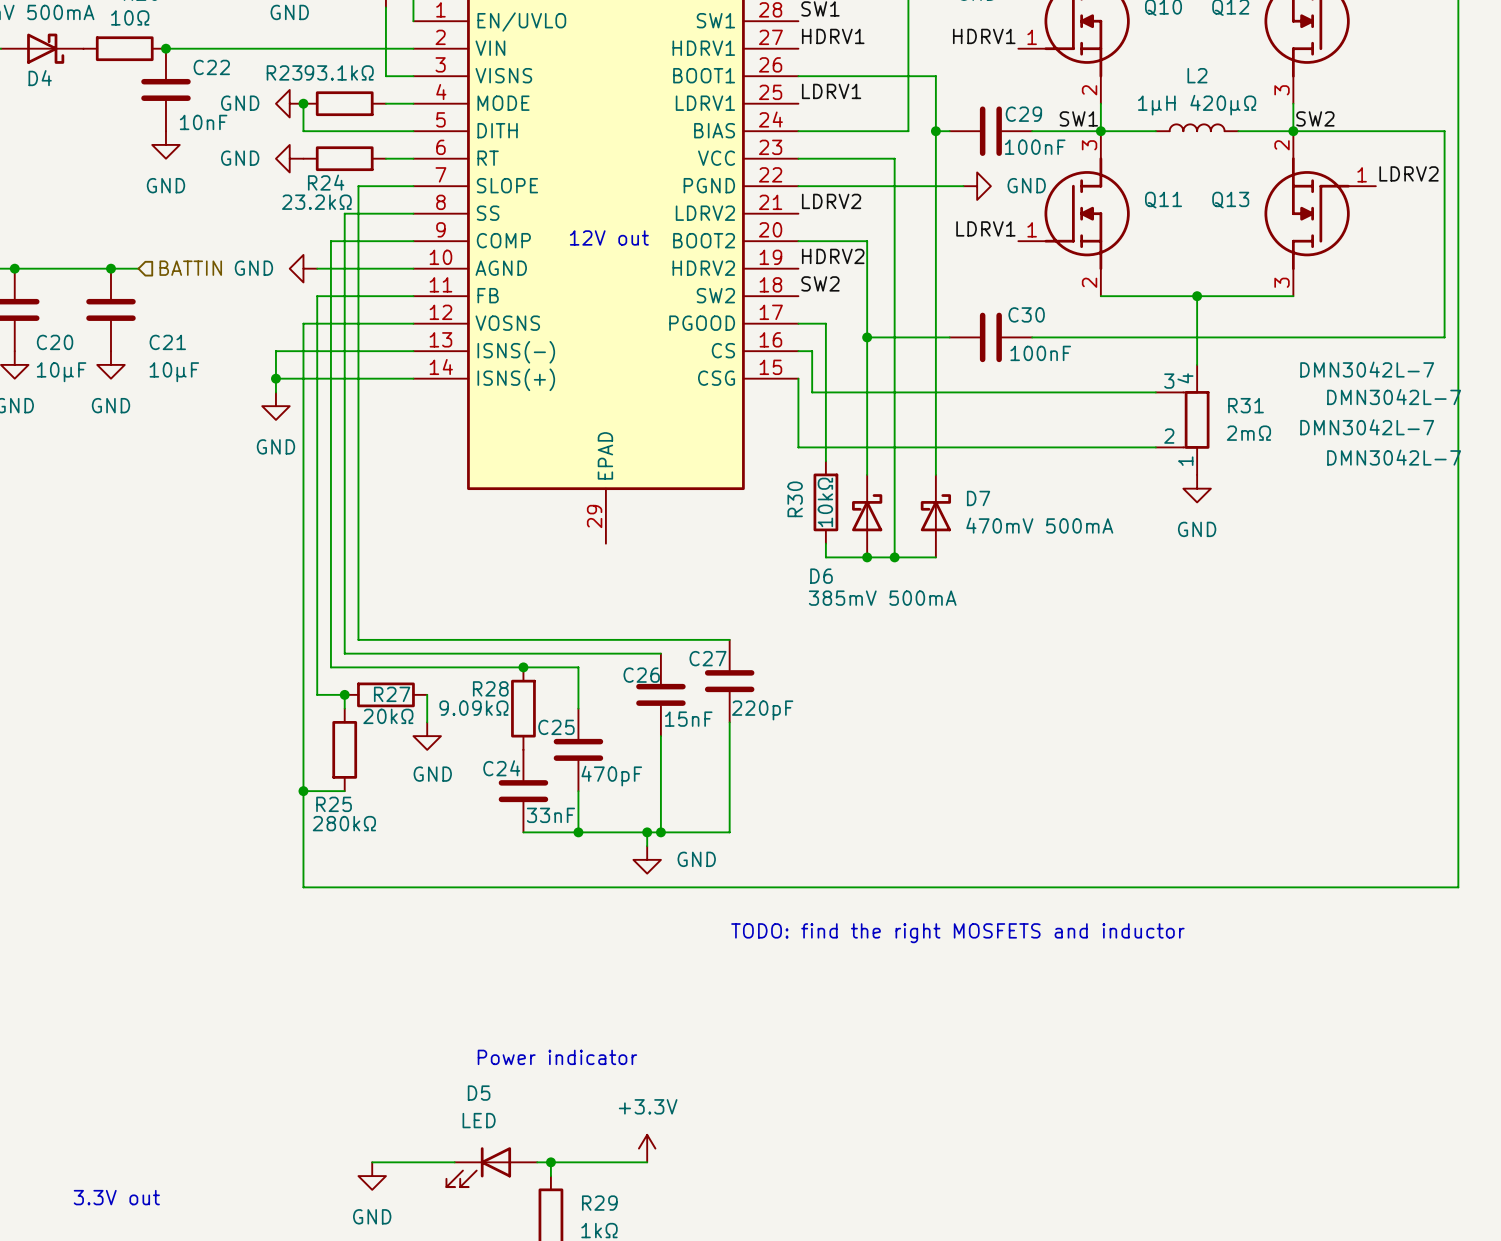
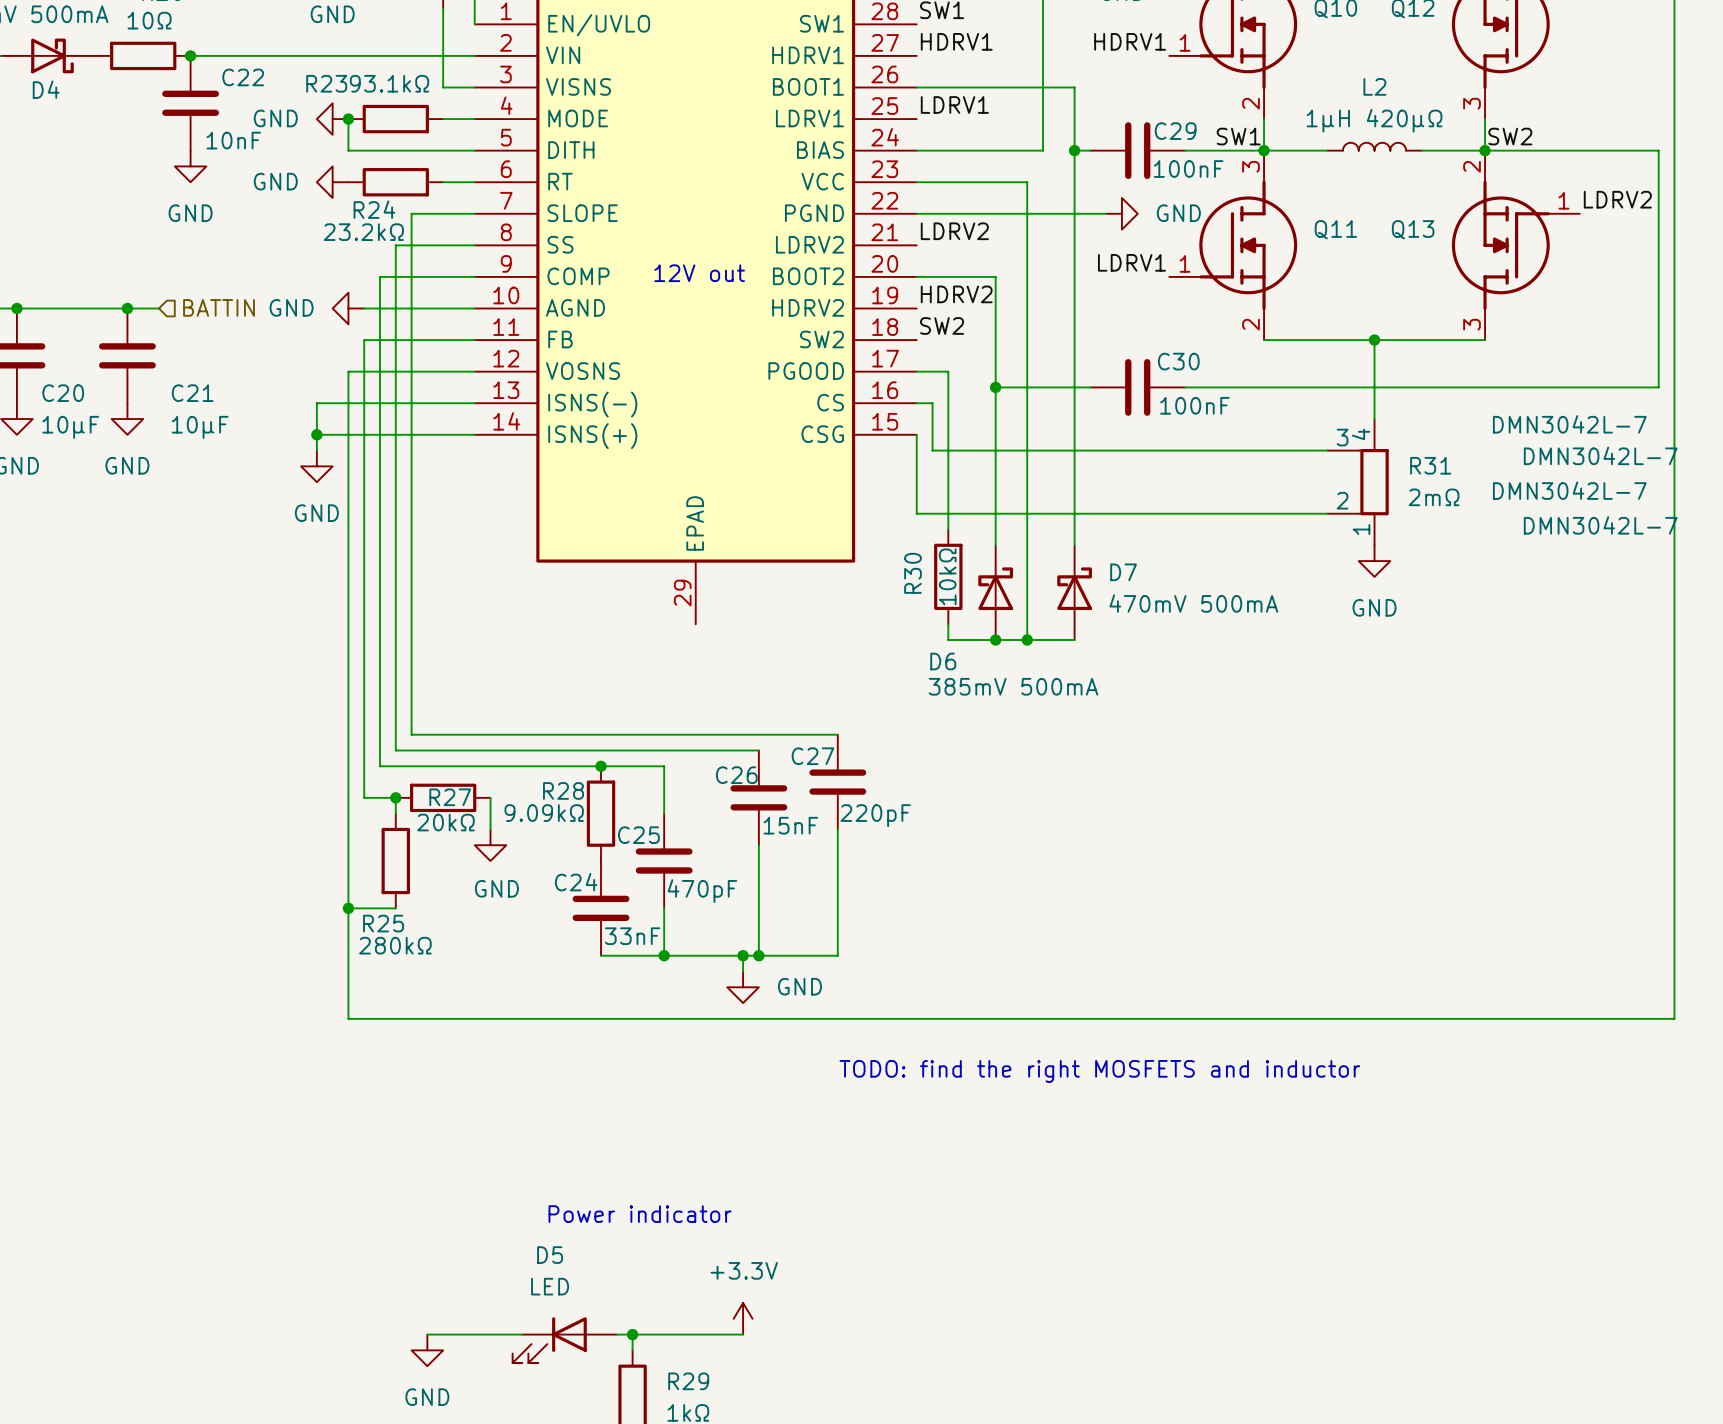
text: 3.3V out (116, 1197) -> none

